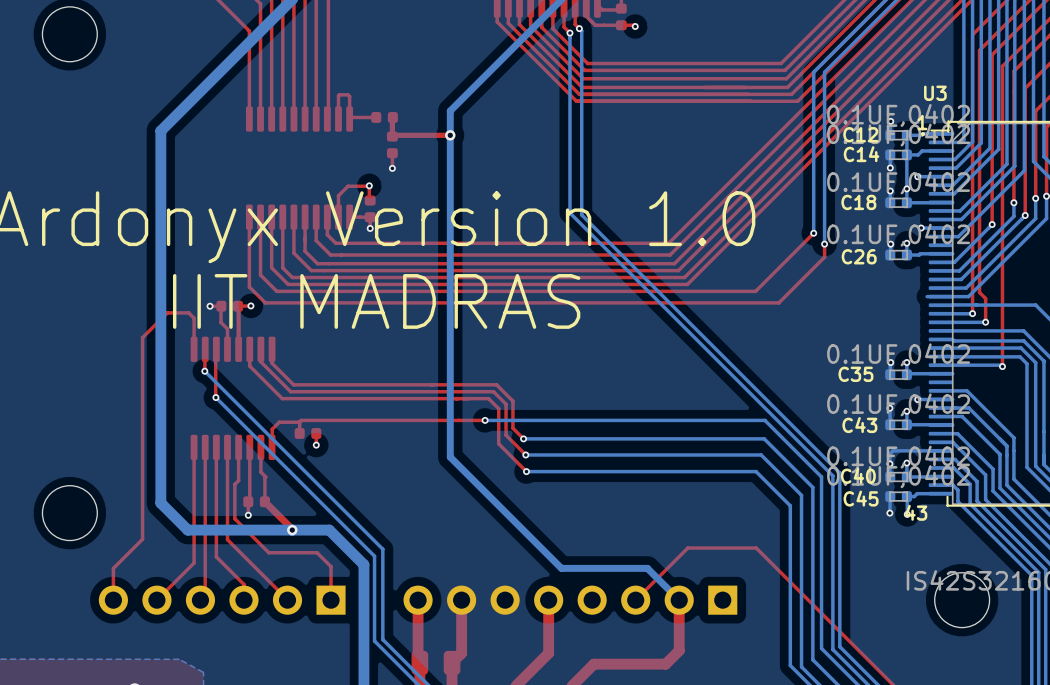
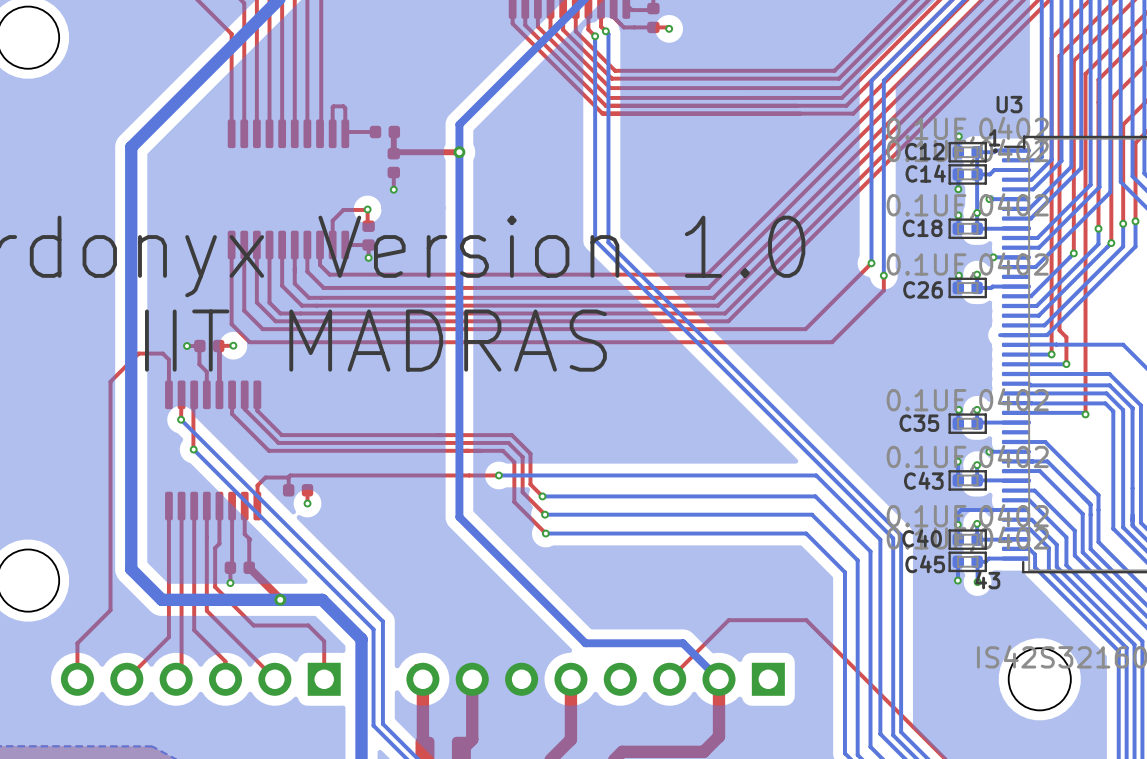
C12 footprint: [885, 129, 912, 141] -> [948, 141, 987, 163]
C14 footprint: [885, 149, 912, 161] -> [948, 164, 987, 185]
C18 footprint: [885, 197, 912, 209] -> [948, 218, 987, 240]
C26 footprint: [885, 249, 912, 261] -> [948, 277, 987, 299]
C35 footprint: [885, 369, 912, 381] -> [948, 413, 987, 434]
C43 footprint: [885, 419, 912, 431] -> [948, 470, 987, 491]
C40 footprint: [885, 471, 912, 483] -> [948, 529, 987, 550]
C45 footprint: [885, 491, 912, 503] -> [948, 551, 987, 573]

